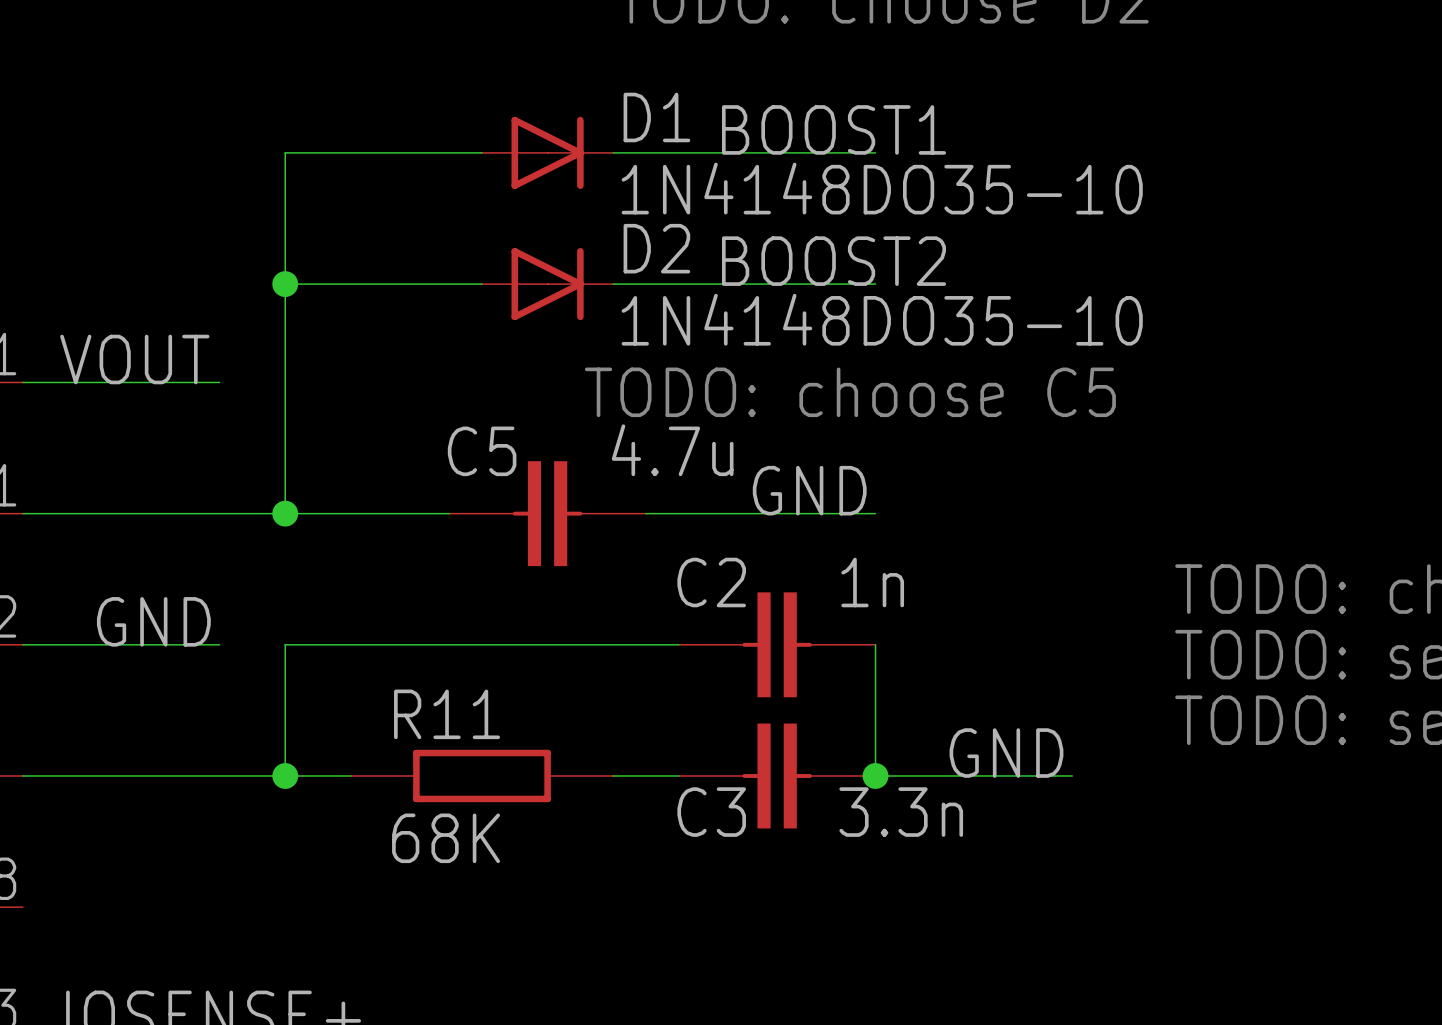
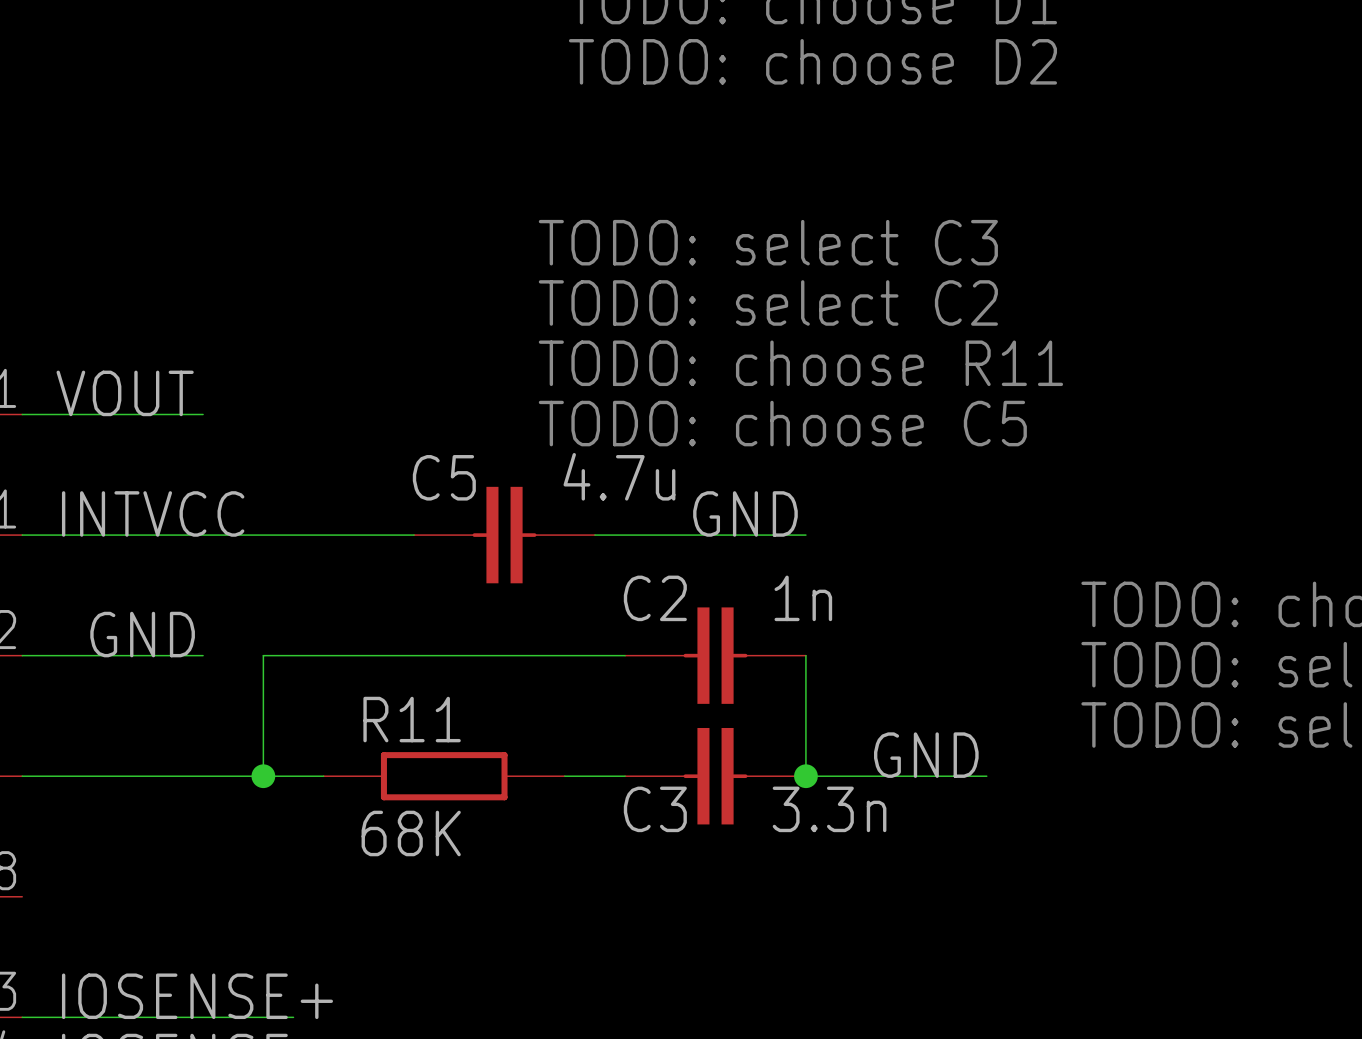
label: BOOST1 (833, 129) -> none
wire: (482, 152) (285, 152) (285, 513) -> none
D1: 1N4148DO35-10 (547, 152) -> none
wire: (613, 152) (875, 152) -> none
text: none -> TODO: select C3 (768, 242)
label: BOOST2 (833, 261) -> none
text: none -> TODO: select C2 (768, 302)
wire: (285, 284) (482, 284) -> none
junction: (285, 284) -> none
D2: 1N4148DO35-10 (547, 284) -> none
wire: (613, 284) (875, 284) -> none
text: none -> TODO: choose R11 (800, 363)
label: none -> INTVCC (153, 513)
junction: (285, 513) -> none

